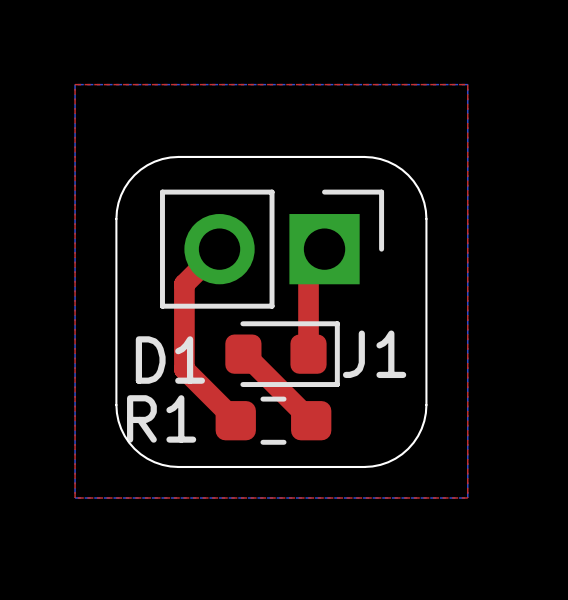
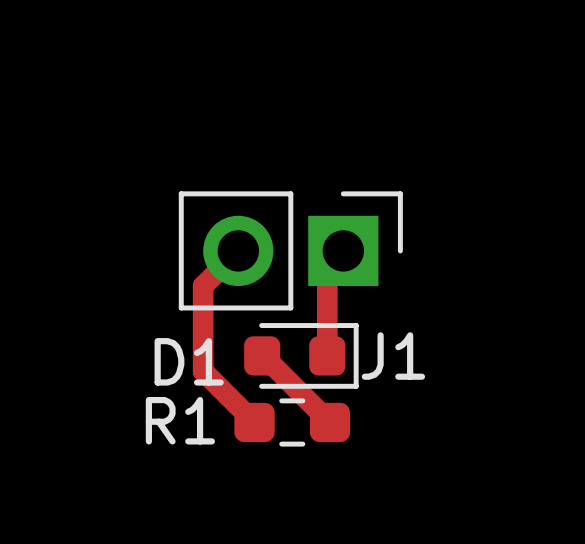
top zone outline: (75, 84) (75, 498) (467, 498) (467, 84) (75, 84) -> none
bottom zone outline: (75, 84) (467, 84) (467, 498) (75, 498) (75, 84) -> none
board edge: (178, 156) (372, 157) (395, 165) (413, 181) (421, 195) (426, 218) (426, 404) (421, 428) (413, 442) (402, 454) (388, 462) (364, 466) (178, 466) (154, 462) (140, 454) (129, 442) (118, 421) (116, 404) (116, 210) (121, 195) (134, 175) (154, 161) (178, 156) -> none

